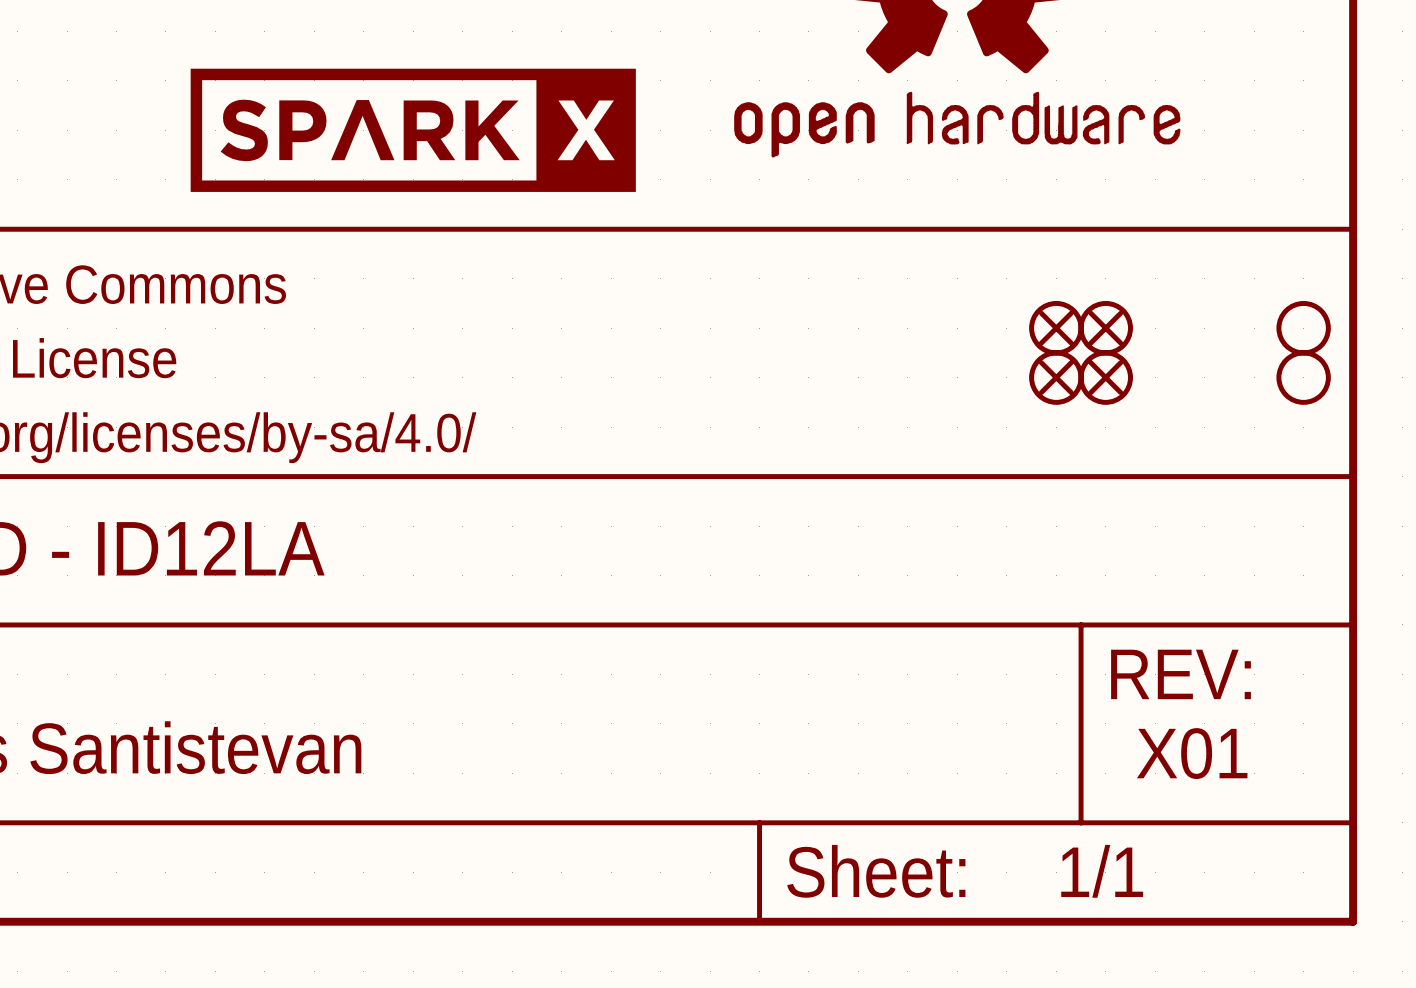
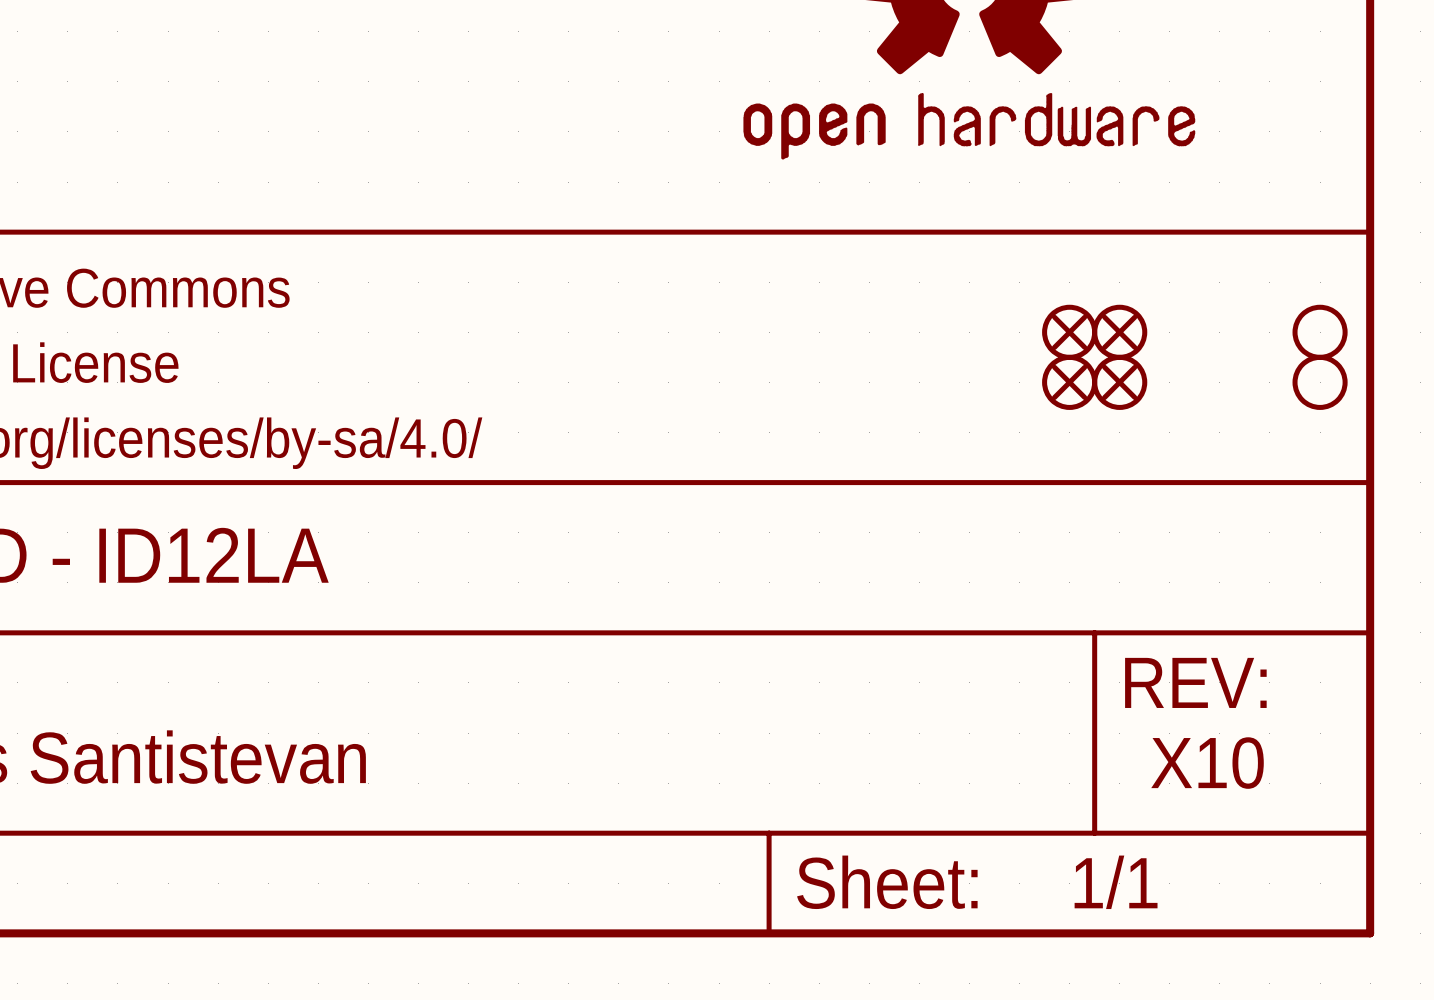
part: (413, 130) -> none
text: X01 (1192, 753) -> X10 (1207, 763)

